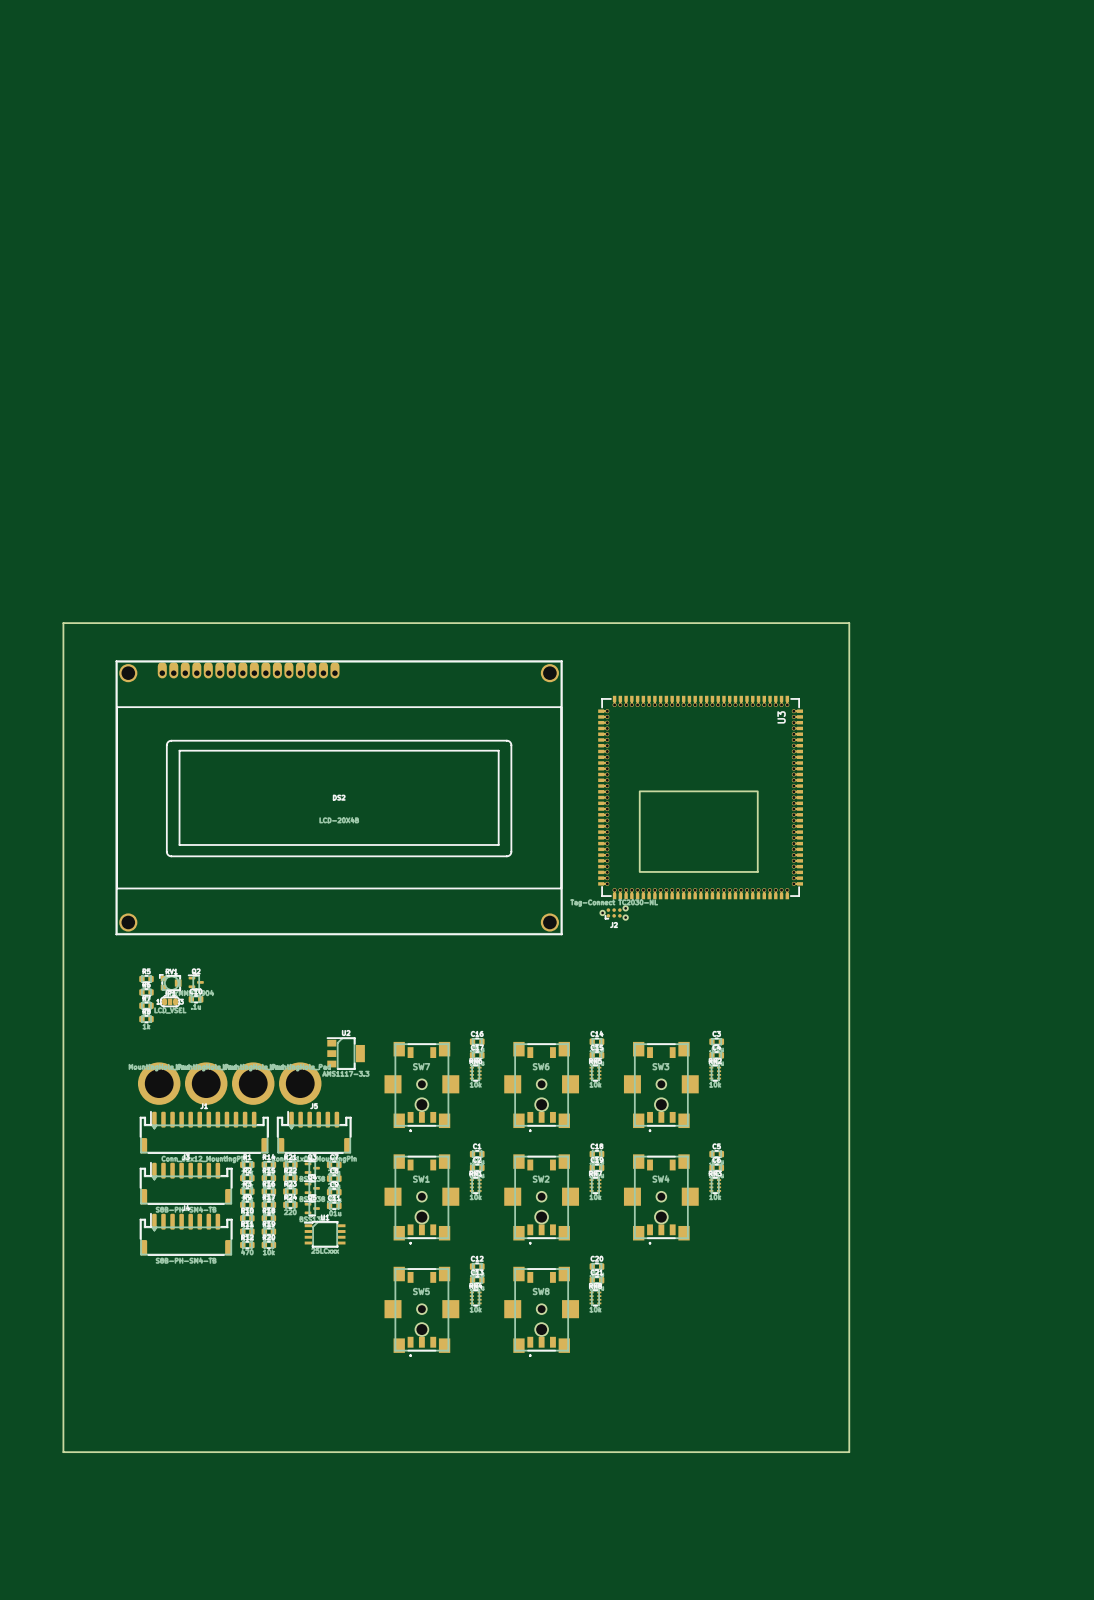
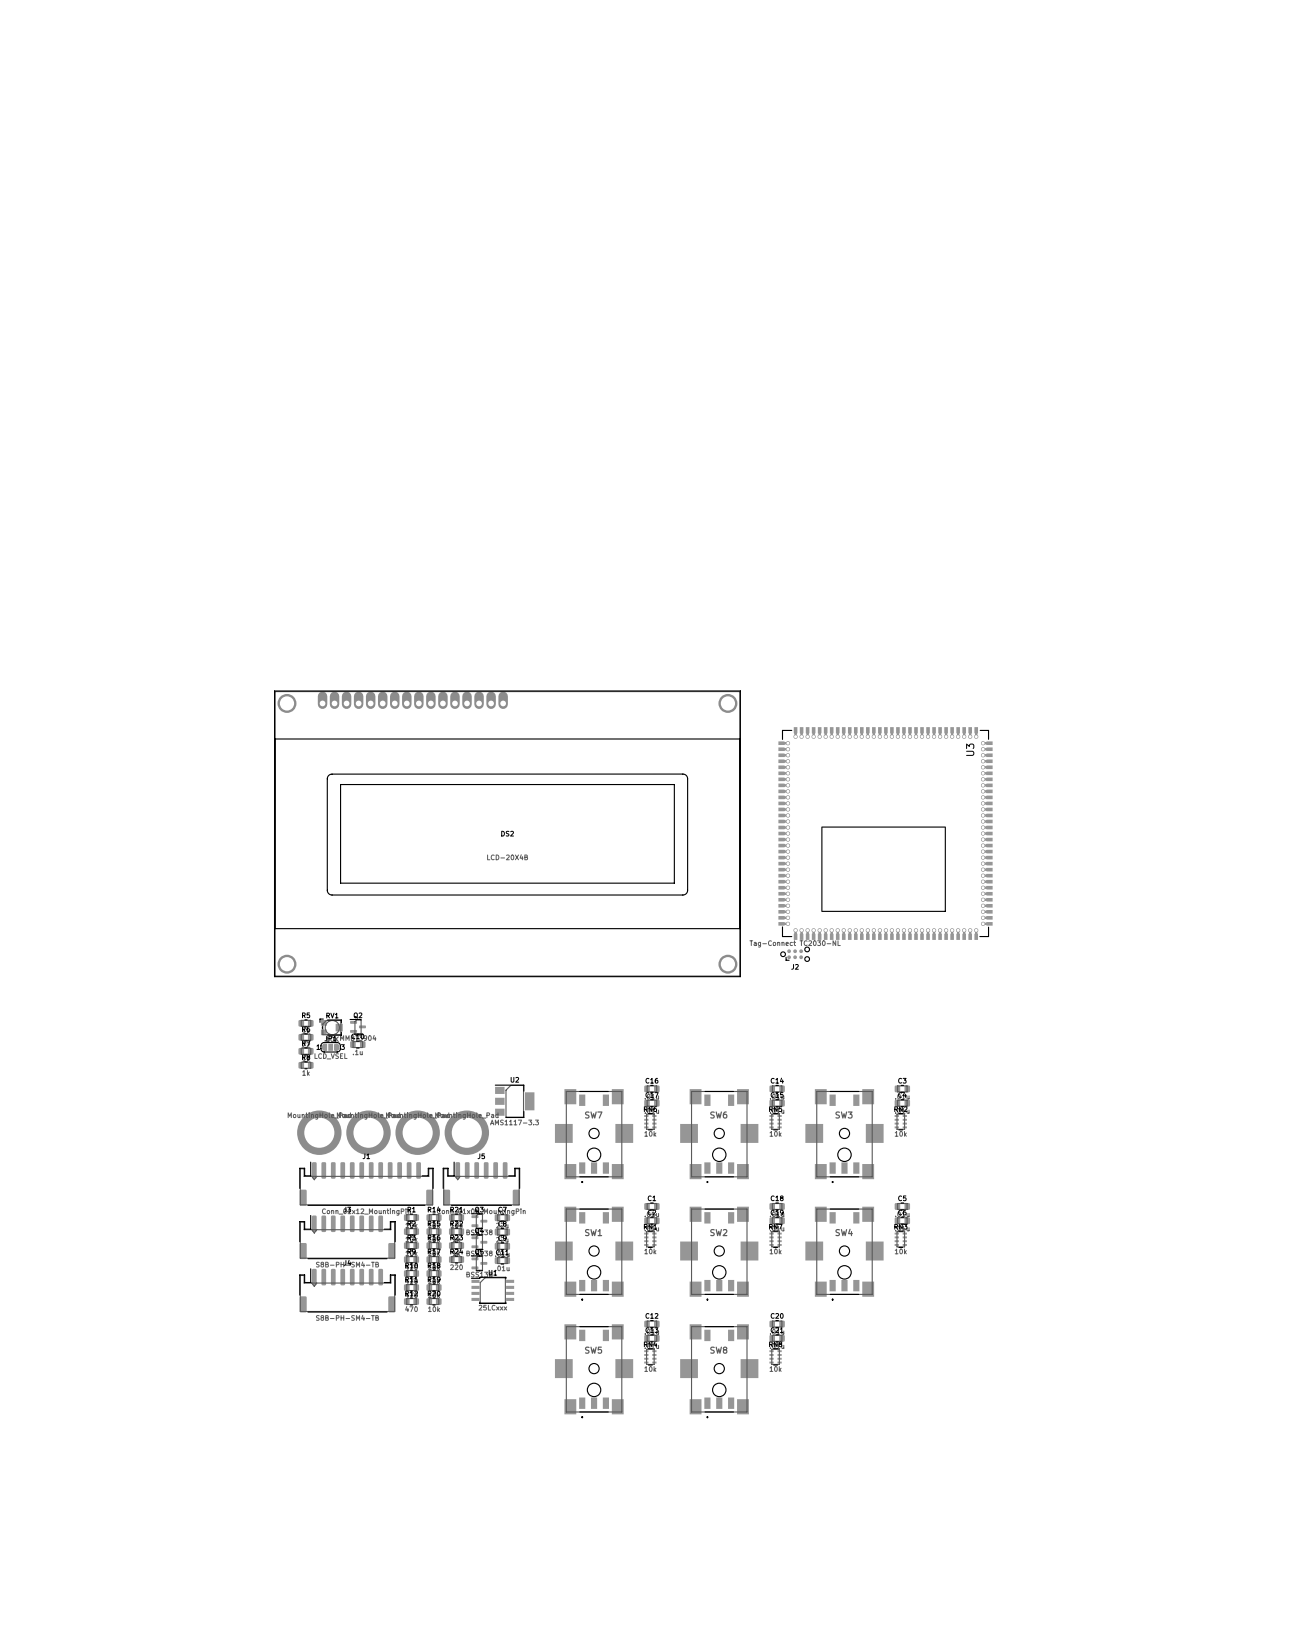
board edge: (63, 623) (849, 623) (849, 1452) (63, 1452) (63, 623) -> none

